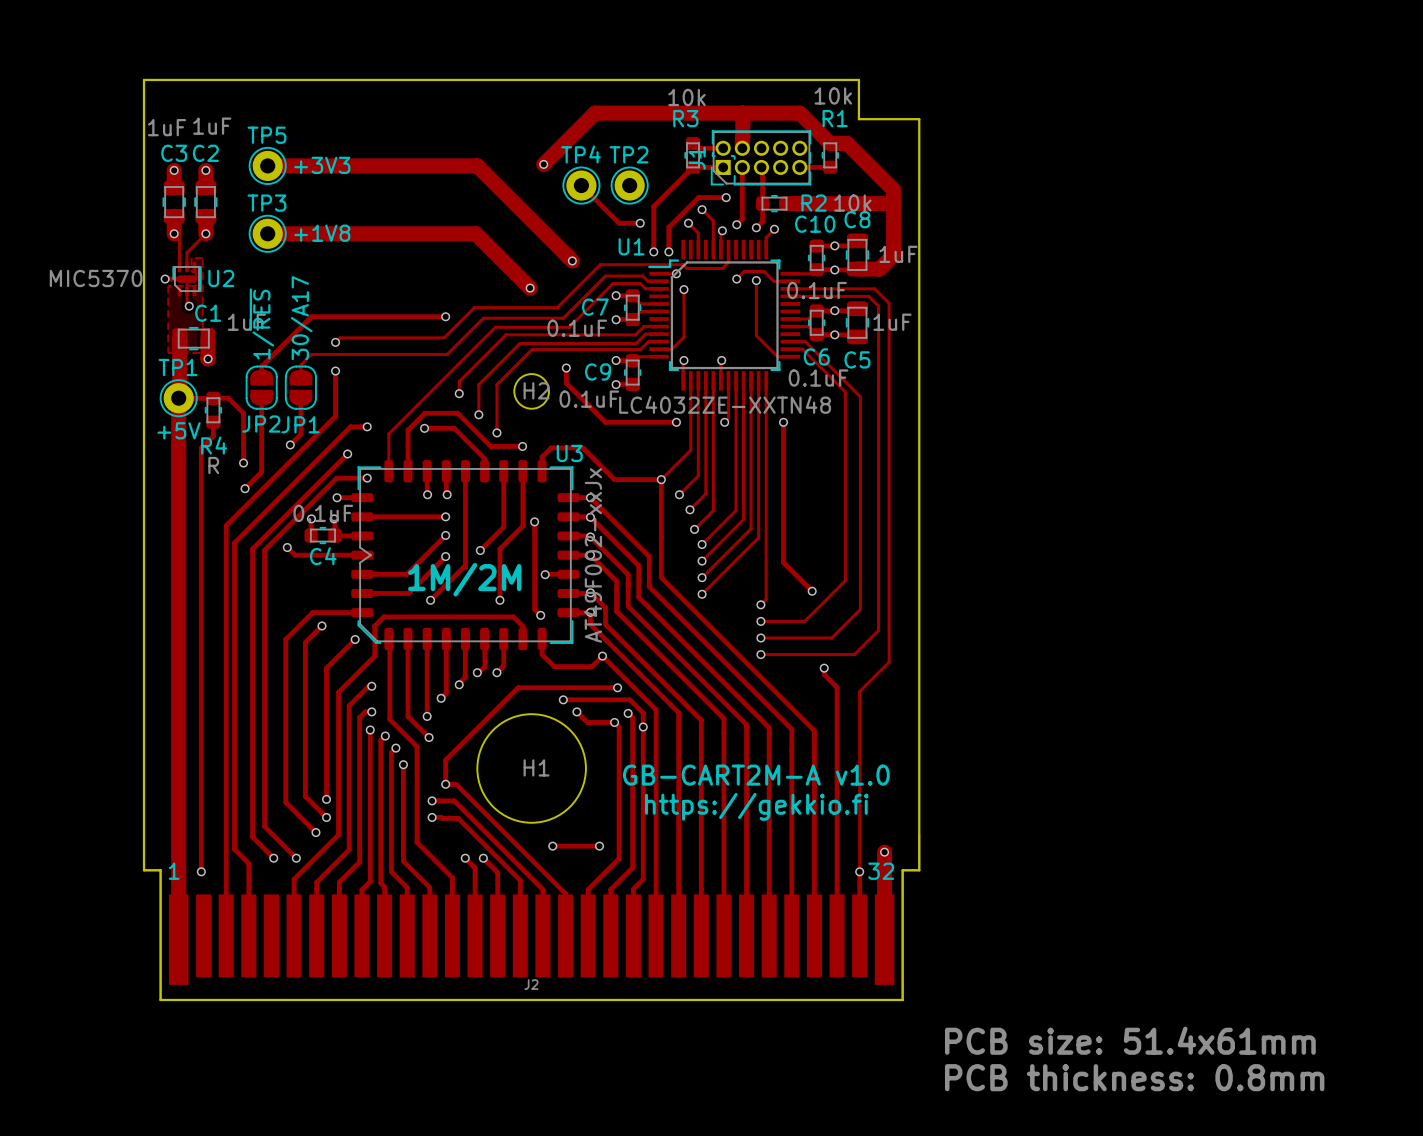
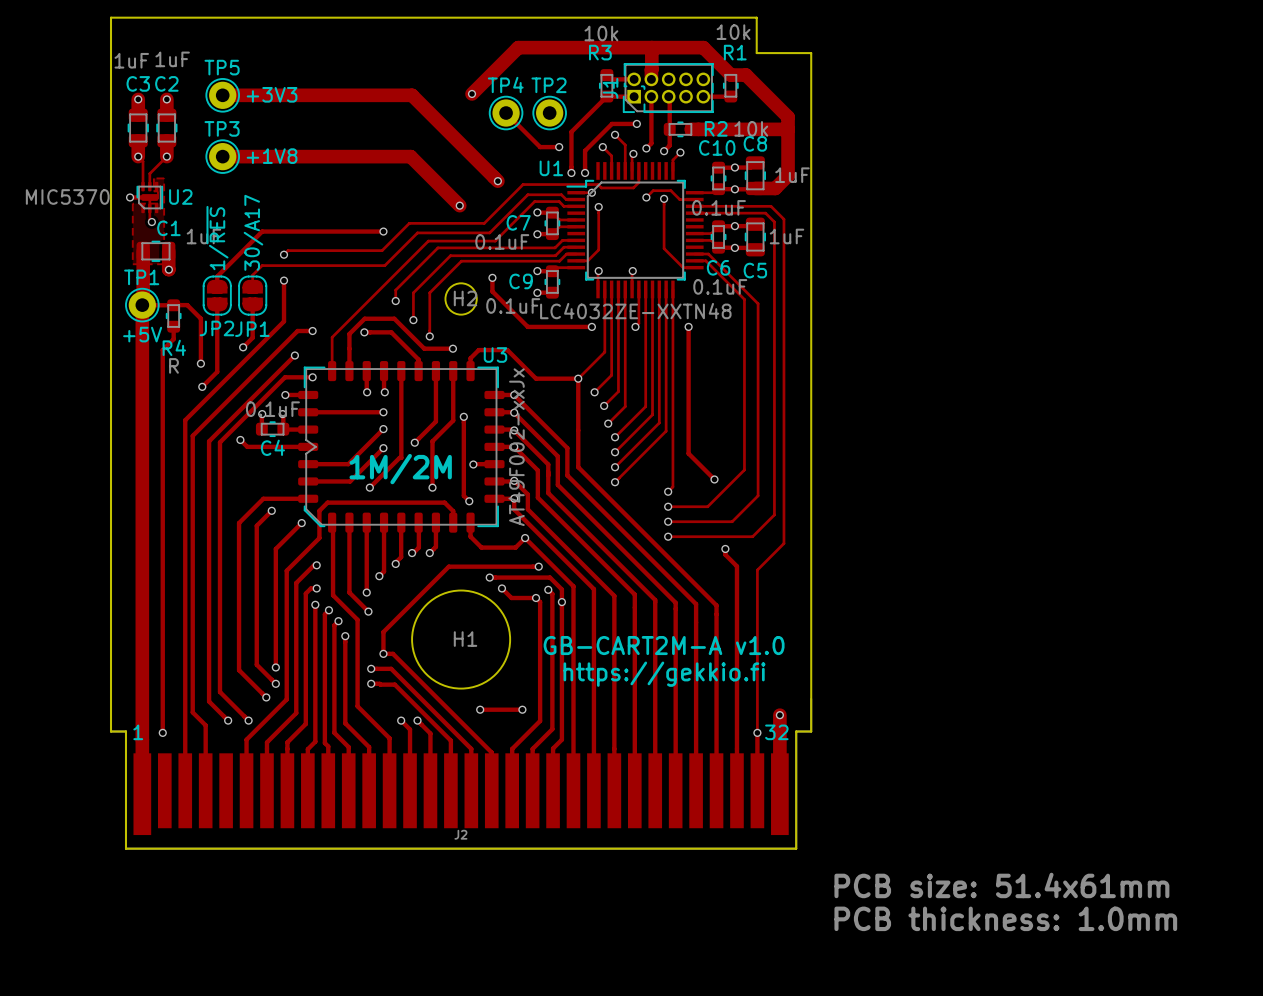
text: PCB thickness: 0.8mm (1134, 1077) -> PCB thickness: 1.0mm (1005, 918)

